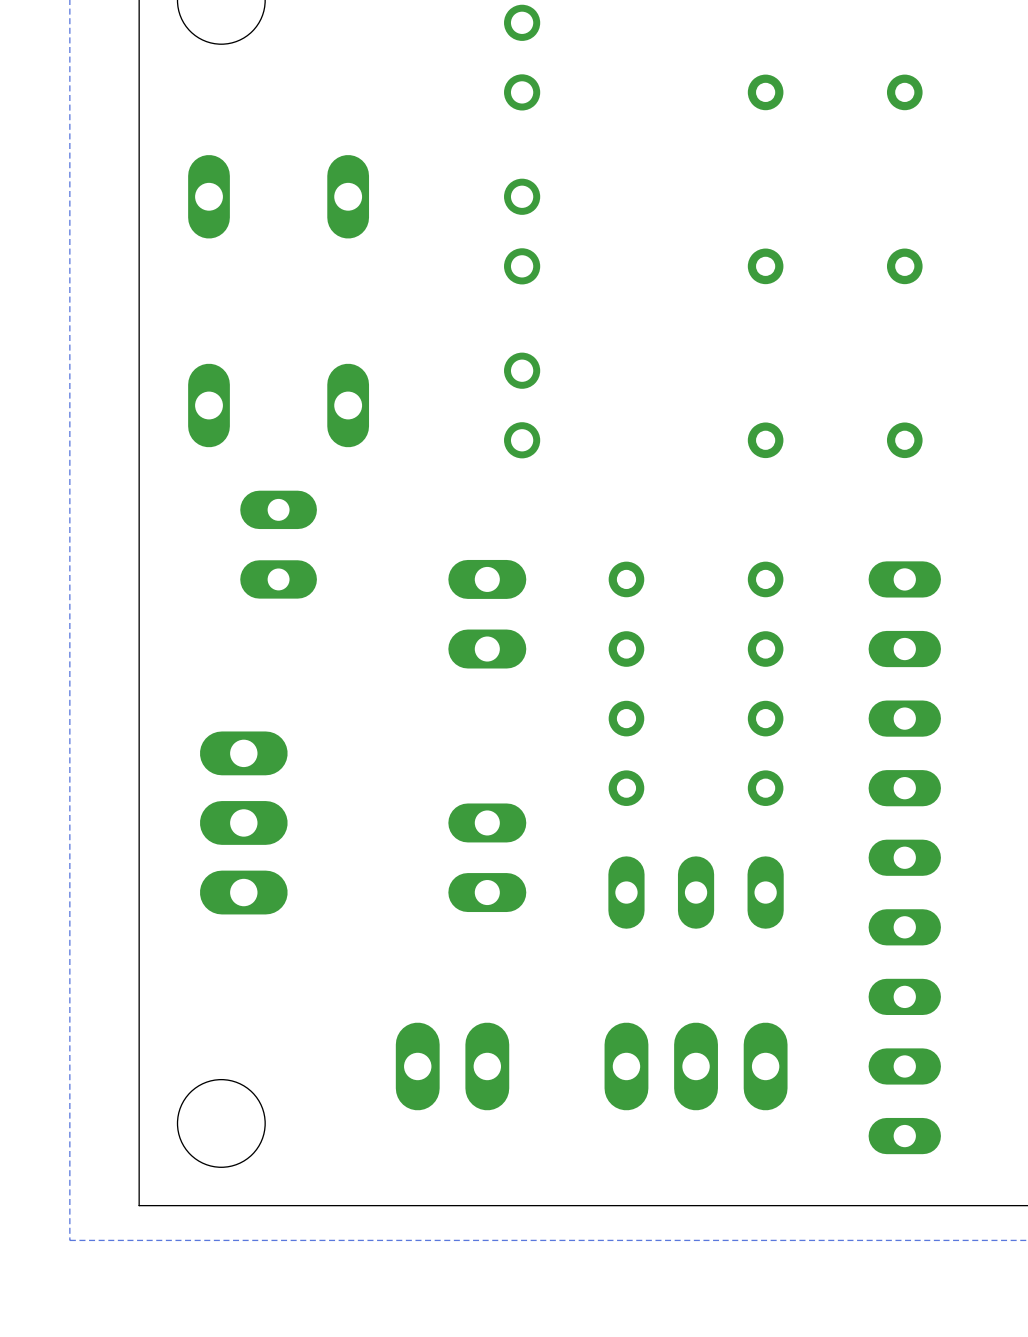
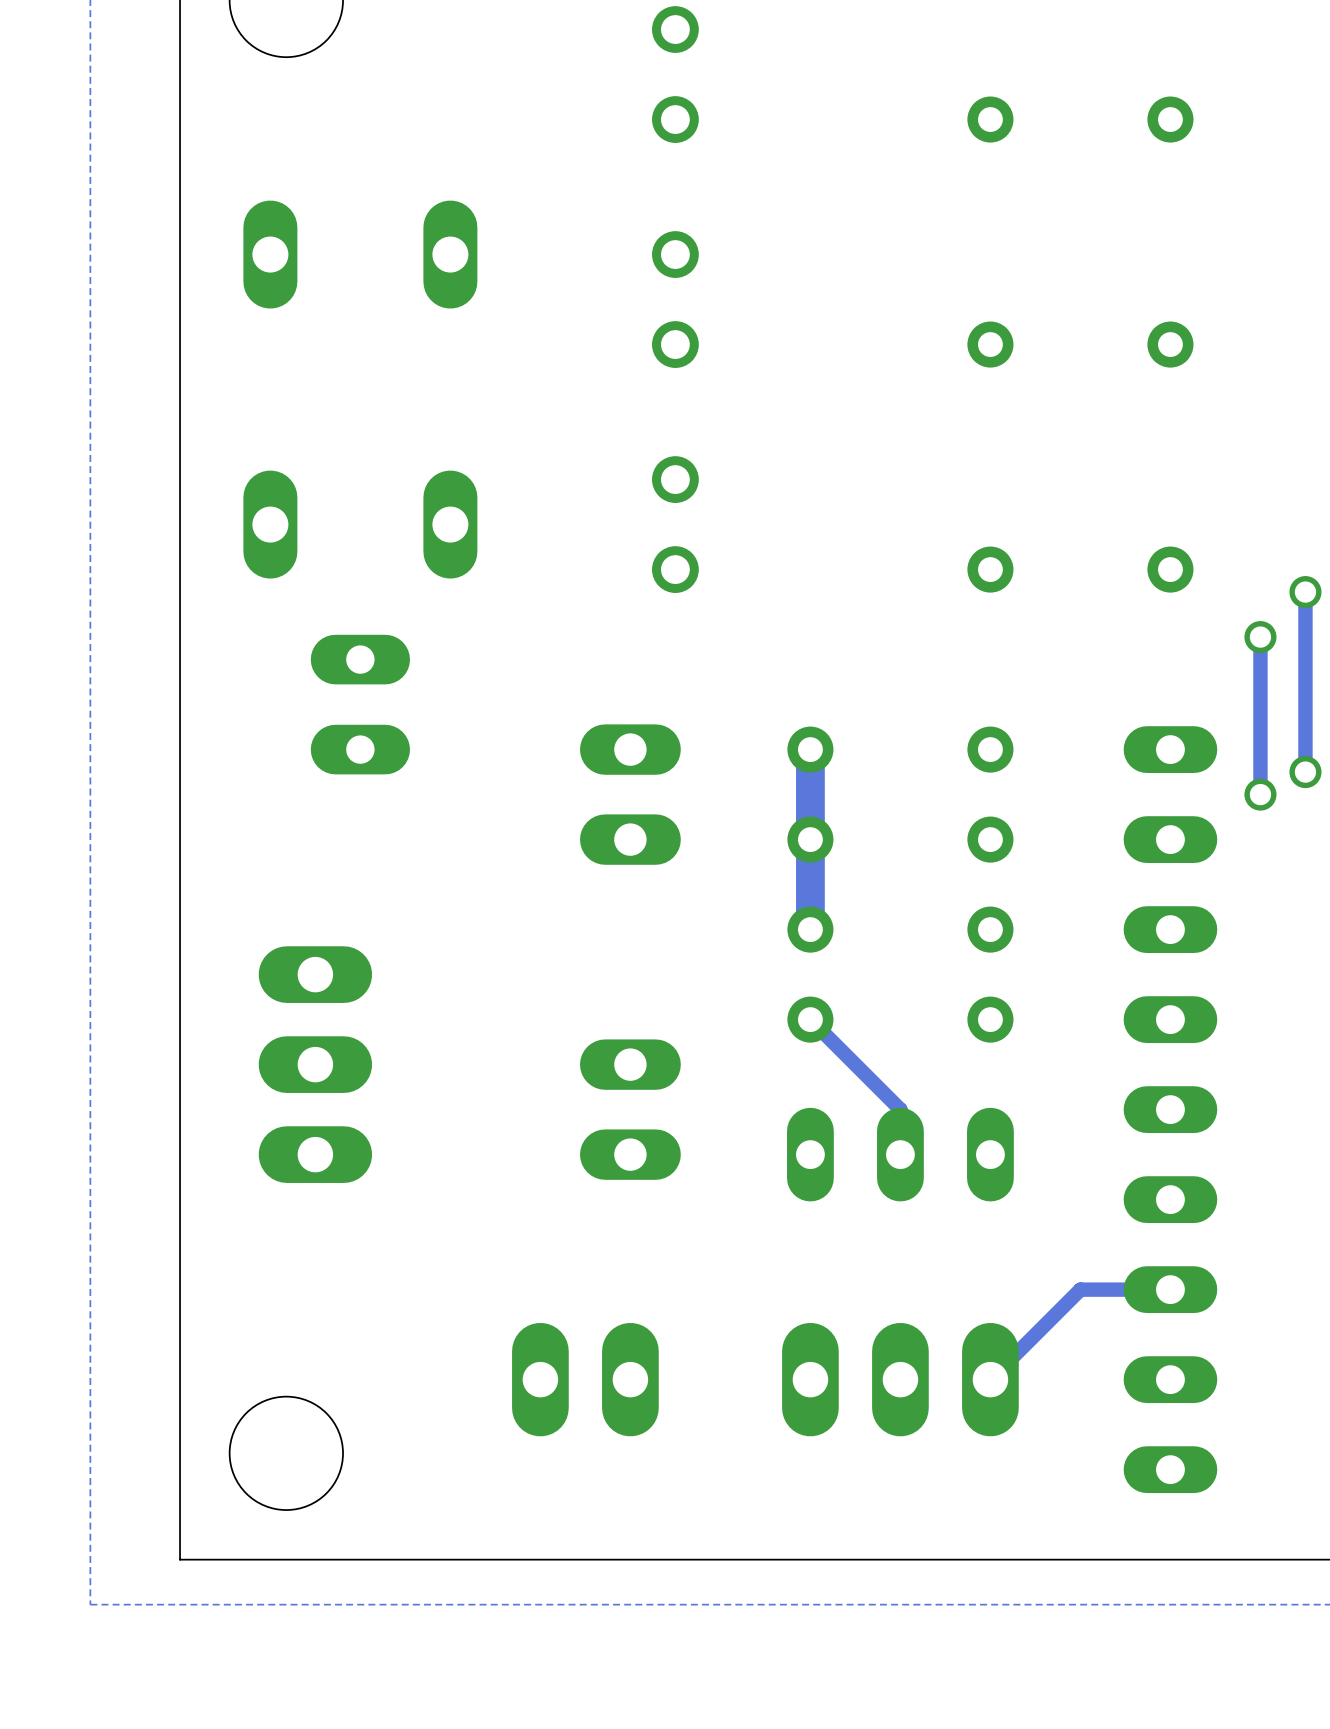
track: none -> (1305, 592) (1305, 772)
via: none -> (1305, 592)
track: none -> (1260, 637) (1260, 794)
via: none -> (1260, 637)
track: none -> (810, 749) (810, 929)
via: none -> (1305, 772)
via: none -> (1260, 794)
track: none -> (810, 1019) (900, 1109) (900, 1154)
track: none -> (1170, 1289) (1080, 1289) (990, 1379)

